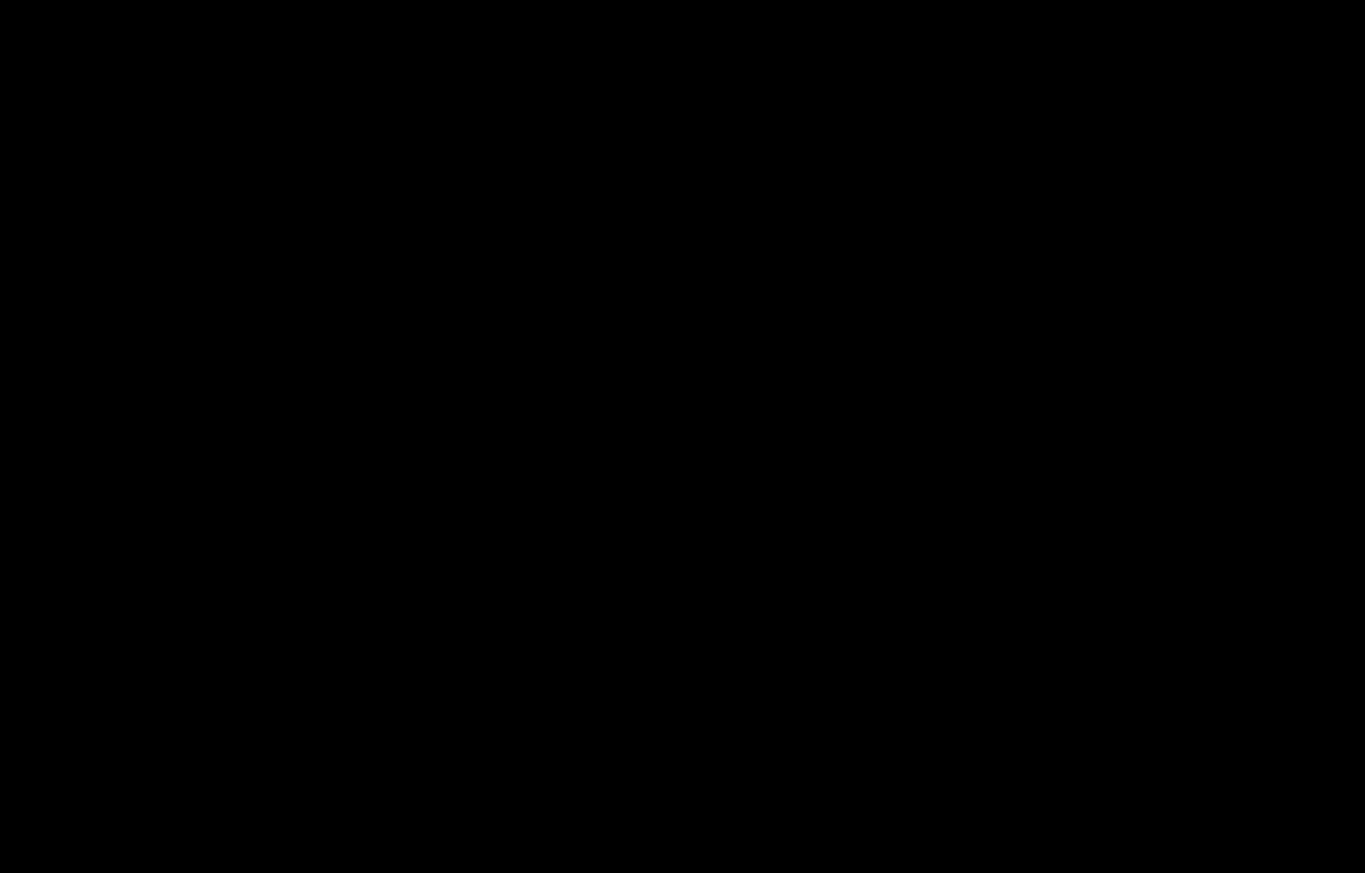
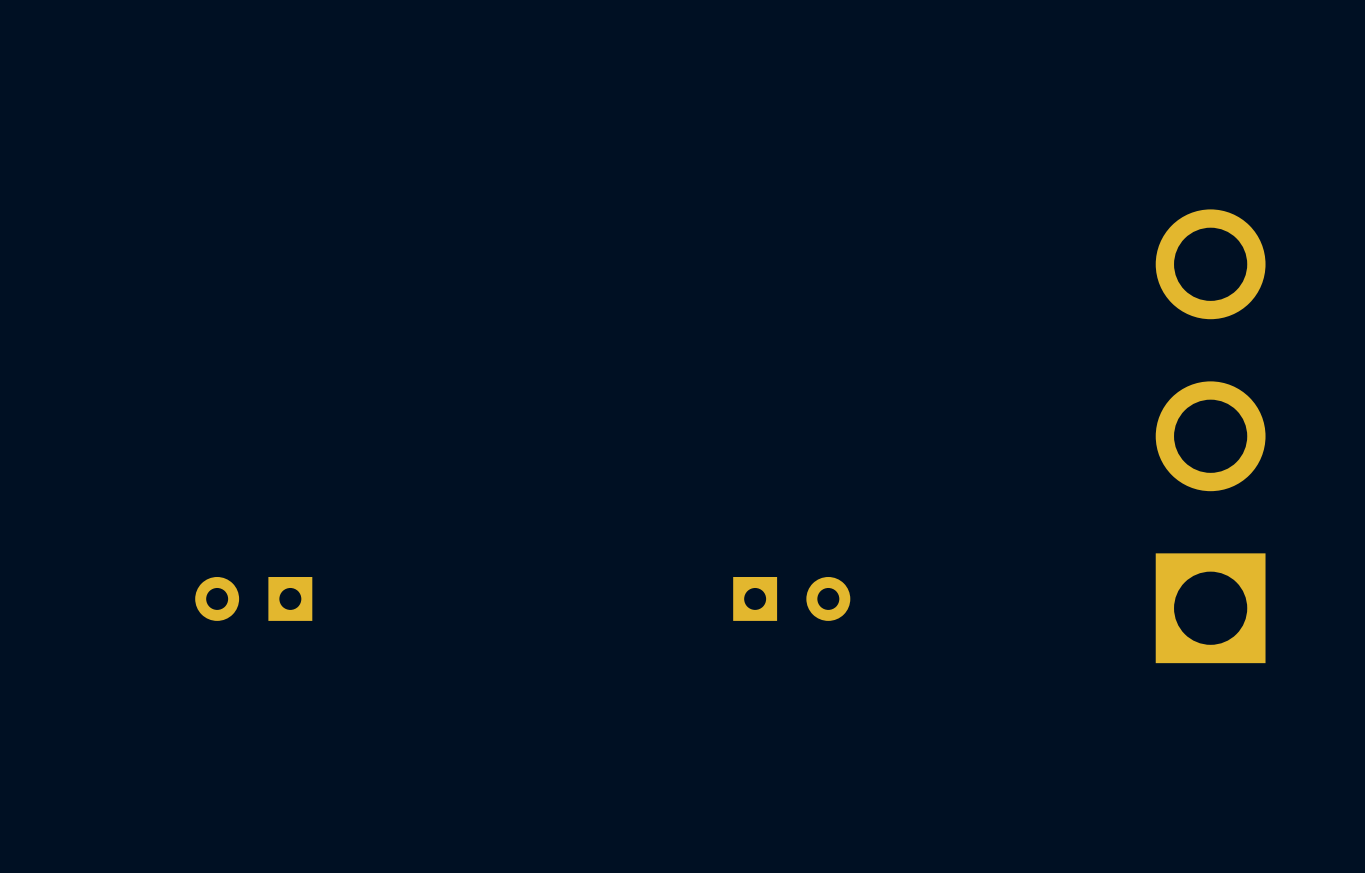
part: none -> (1210, 436)
part: none -> (253, 598)
part: none -> (791, 598)

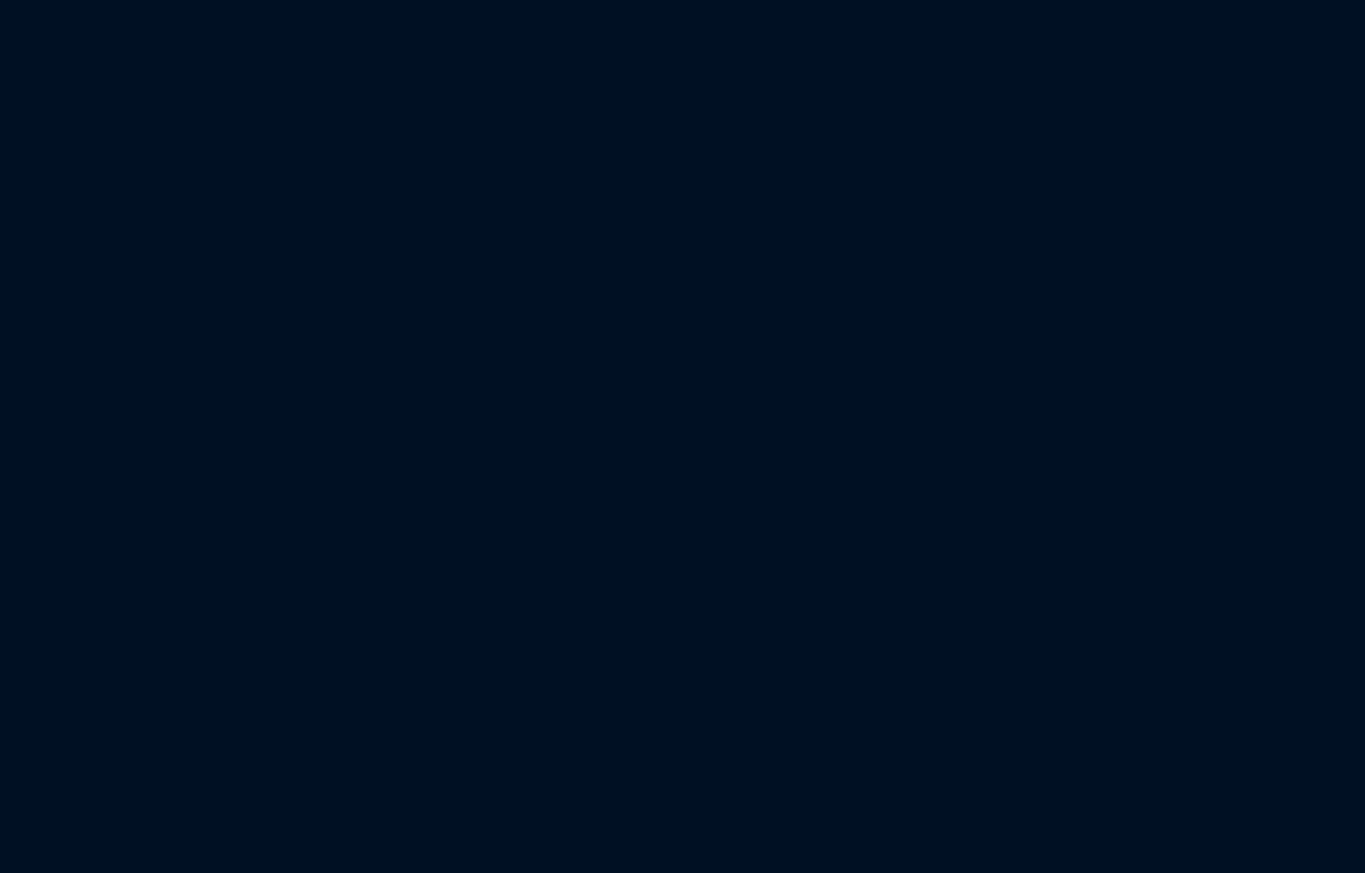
part: (1210, 436) -> none
part: (253, 598) -> none
part: (791, 598) -> none

